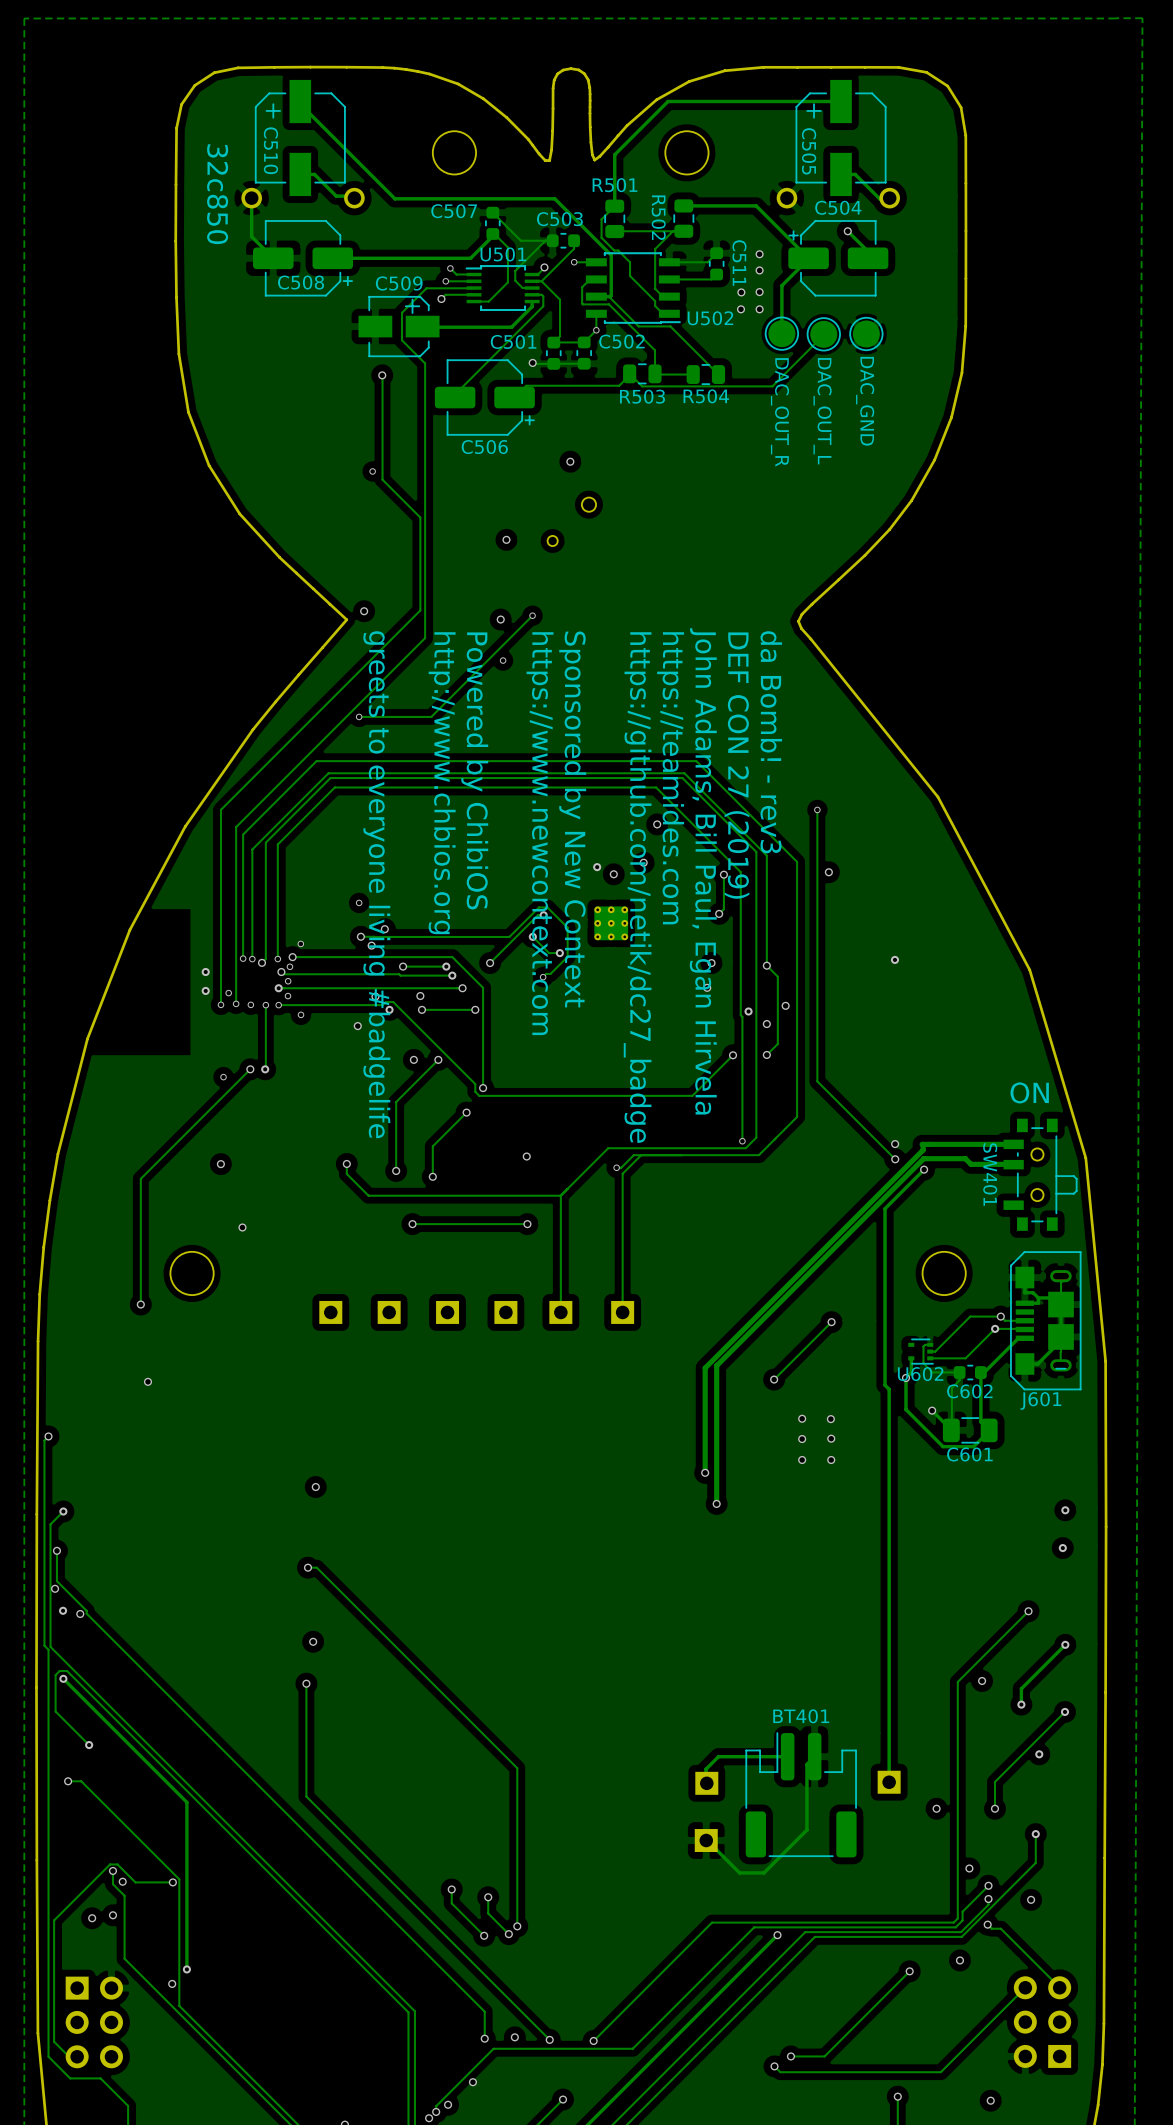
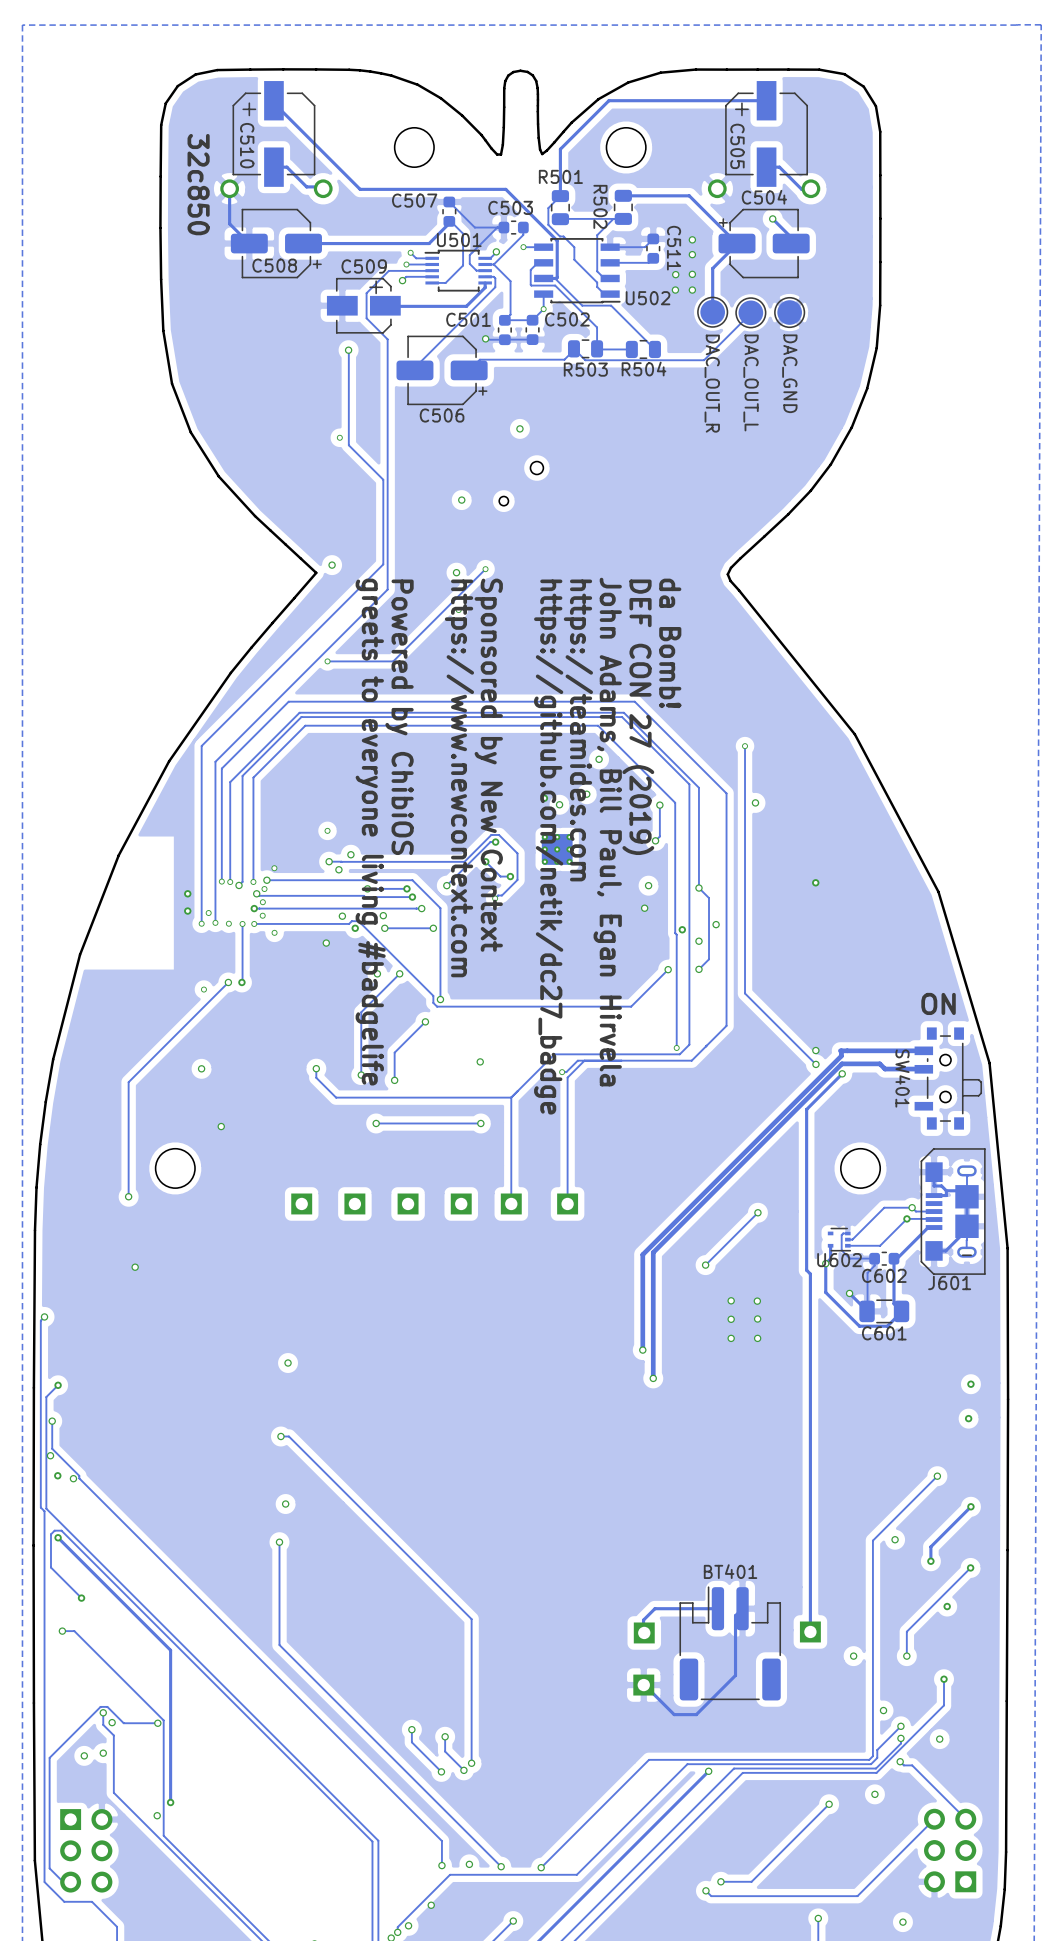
text: da Bomb! - rev3 (771, 742) -> none
text: DEF CON 27 (2019) (736, 765) -> da Bomb! (670, 643)
text: Powered by ChibiOS (474, 770) -> none
text: https://teamides.com (670, 778) -> John Adams, Bill Paul, Egan Hirvela (607, 832)
text: http://www.chbios.org (442, 783) -> Powered by ChibiOS (399, 717)
text: Sponsored by New Context (572, 819) -> none
text: none -> https://www.newcontext.com (459, 778)
text: https://www.newcontext.com (540, 833) -> Sponsored by New Context (488, 765)
text: John Adams, Bill Paul, Egan Hirvela (703, 871) -> DEF CON 27 (2019) (638, 717)
text: none -> https://github.com/netik/dc27_badge (548, 847)
text position: greets to everyone living #badgelife (376, 884) -> greets to everyone living #badgelife (370, 832)
text: https://github.com/netik/dc27_badge (637, 887) -> https://teamides.com (578, 730)

